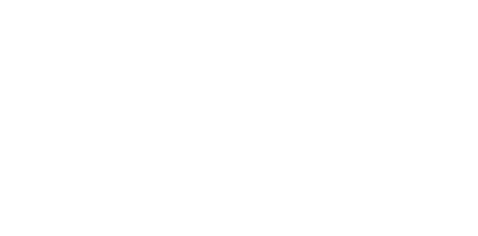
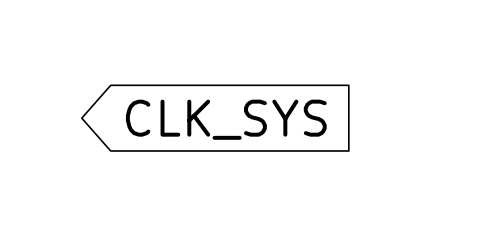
global label: none -> CLK_SYS (226, 119)

